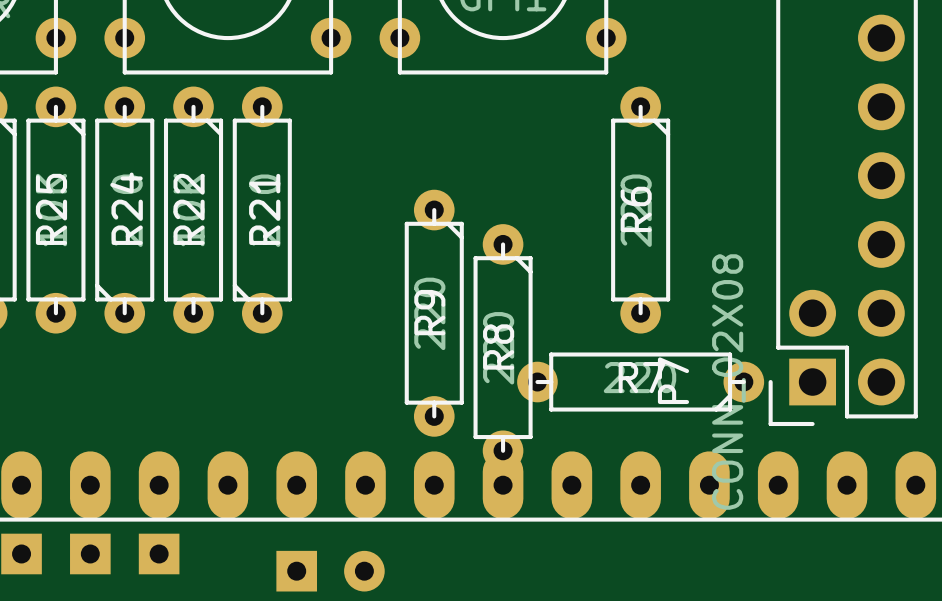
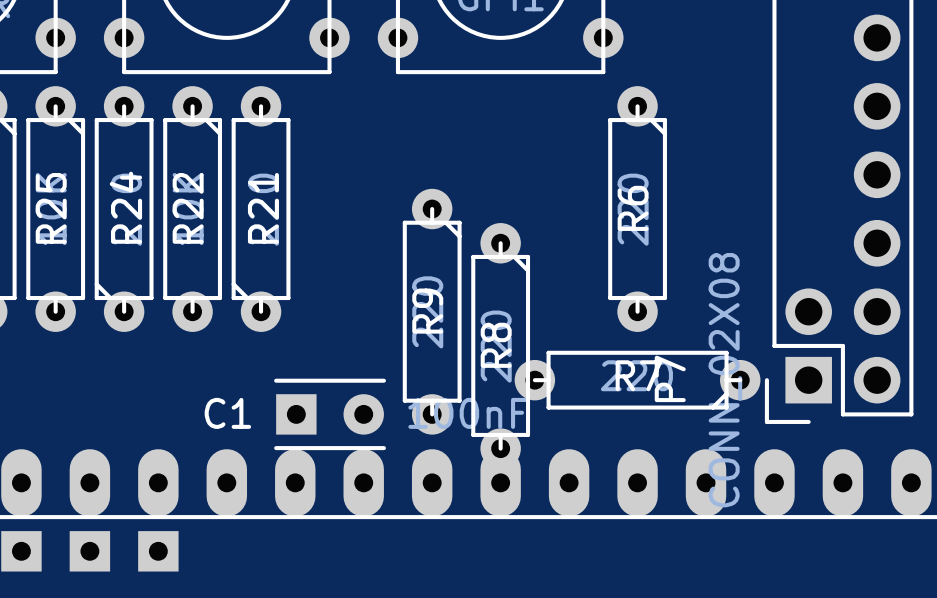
C1 side: bottom (330, 571) -> top (330, 414)

